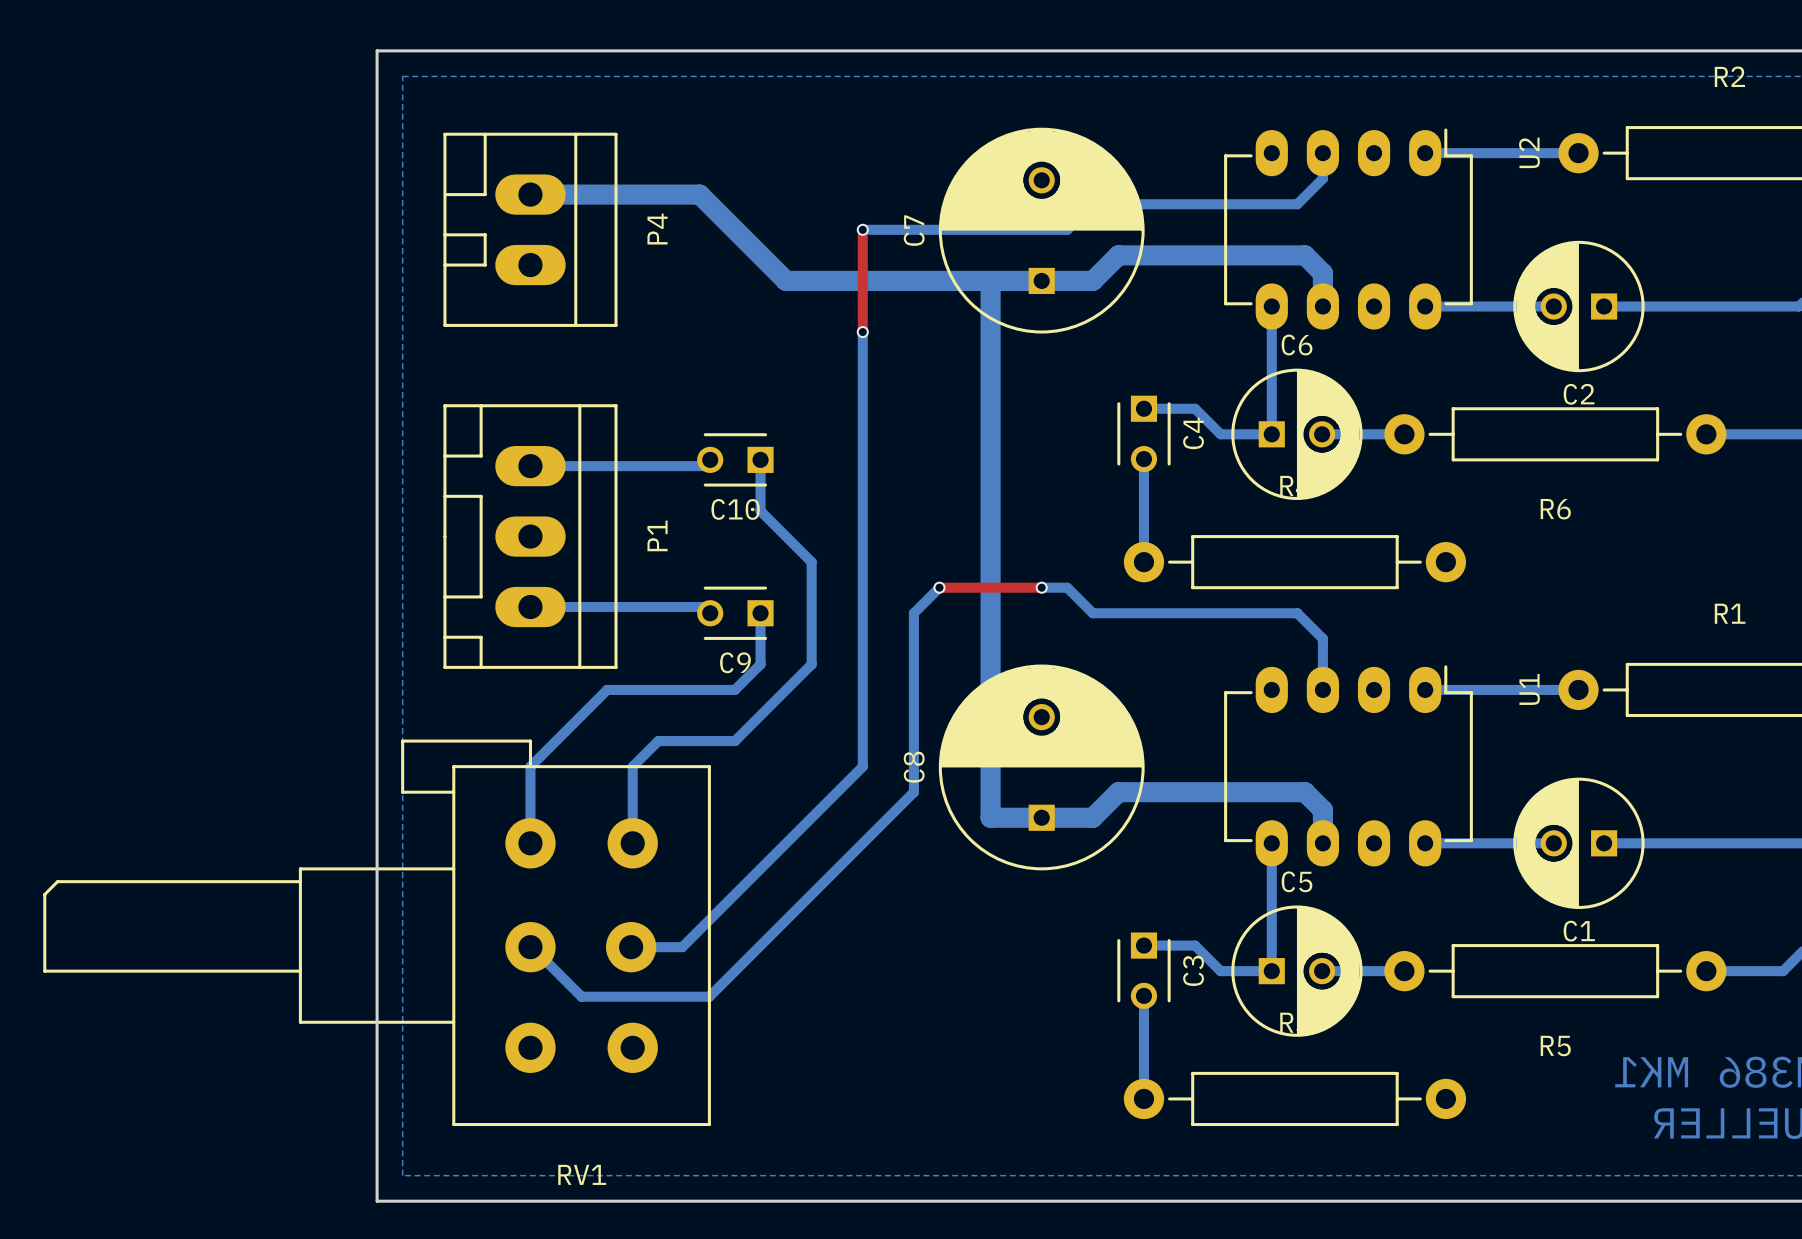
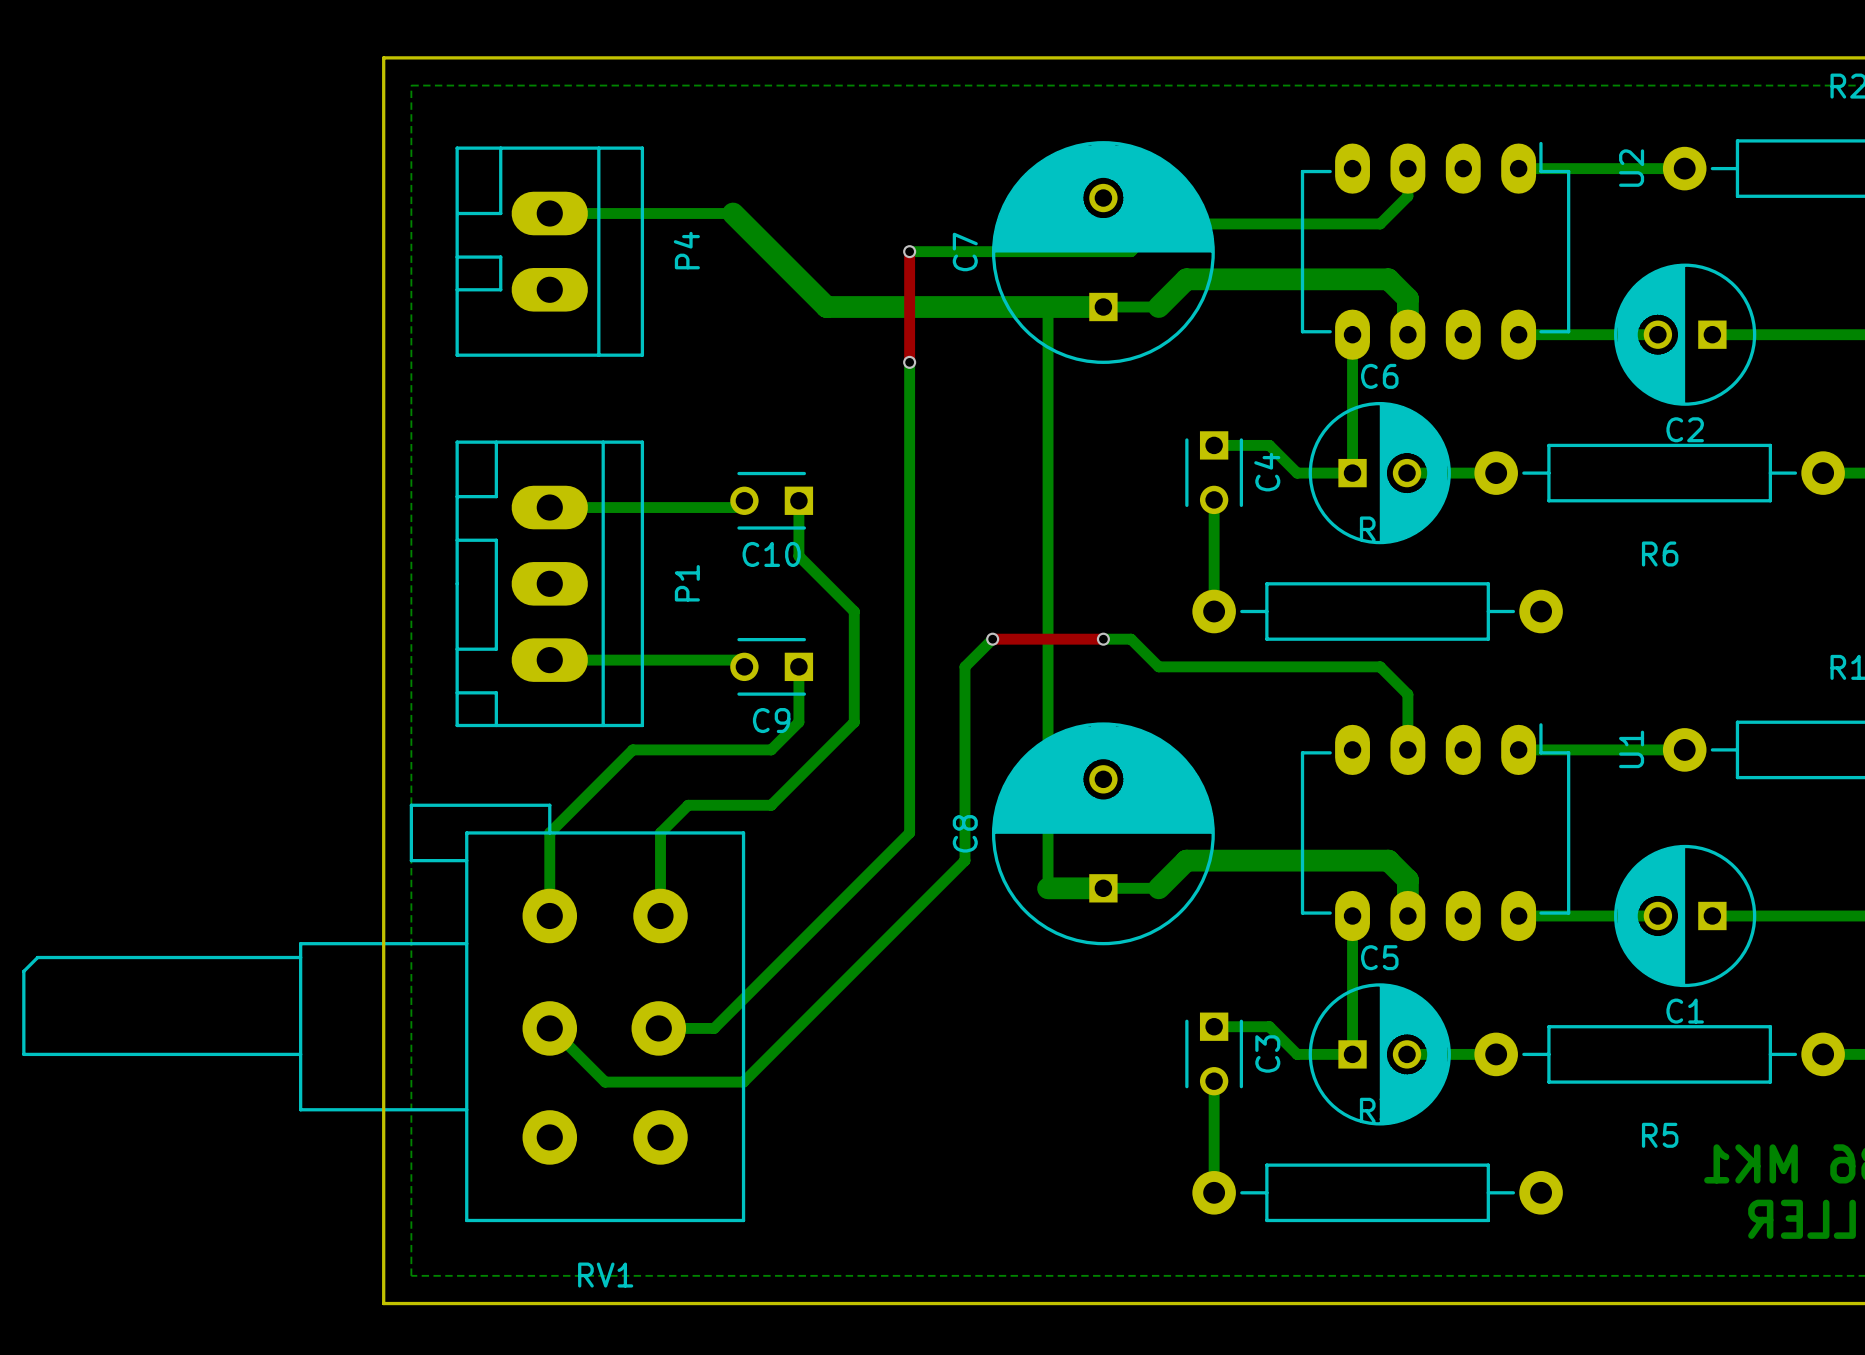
bottom track width: thick (530, 194) (699, 194) -> thin (549, 213) (733, 213)
bottom track width: thick (990, 280) (990, 817) -> thin (1048, 307) (1048, 888)
bottom track width: thick (1041, 280) (1092, 280) -> thin (1103, 307) (1158, 307)
bottom track width: thick (1041, 817) (1092, 817) -> thin (1103, 888) (1158, 888)

